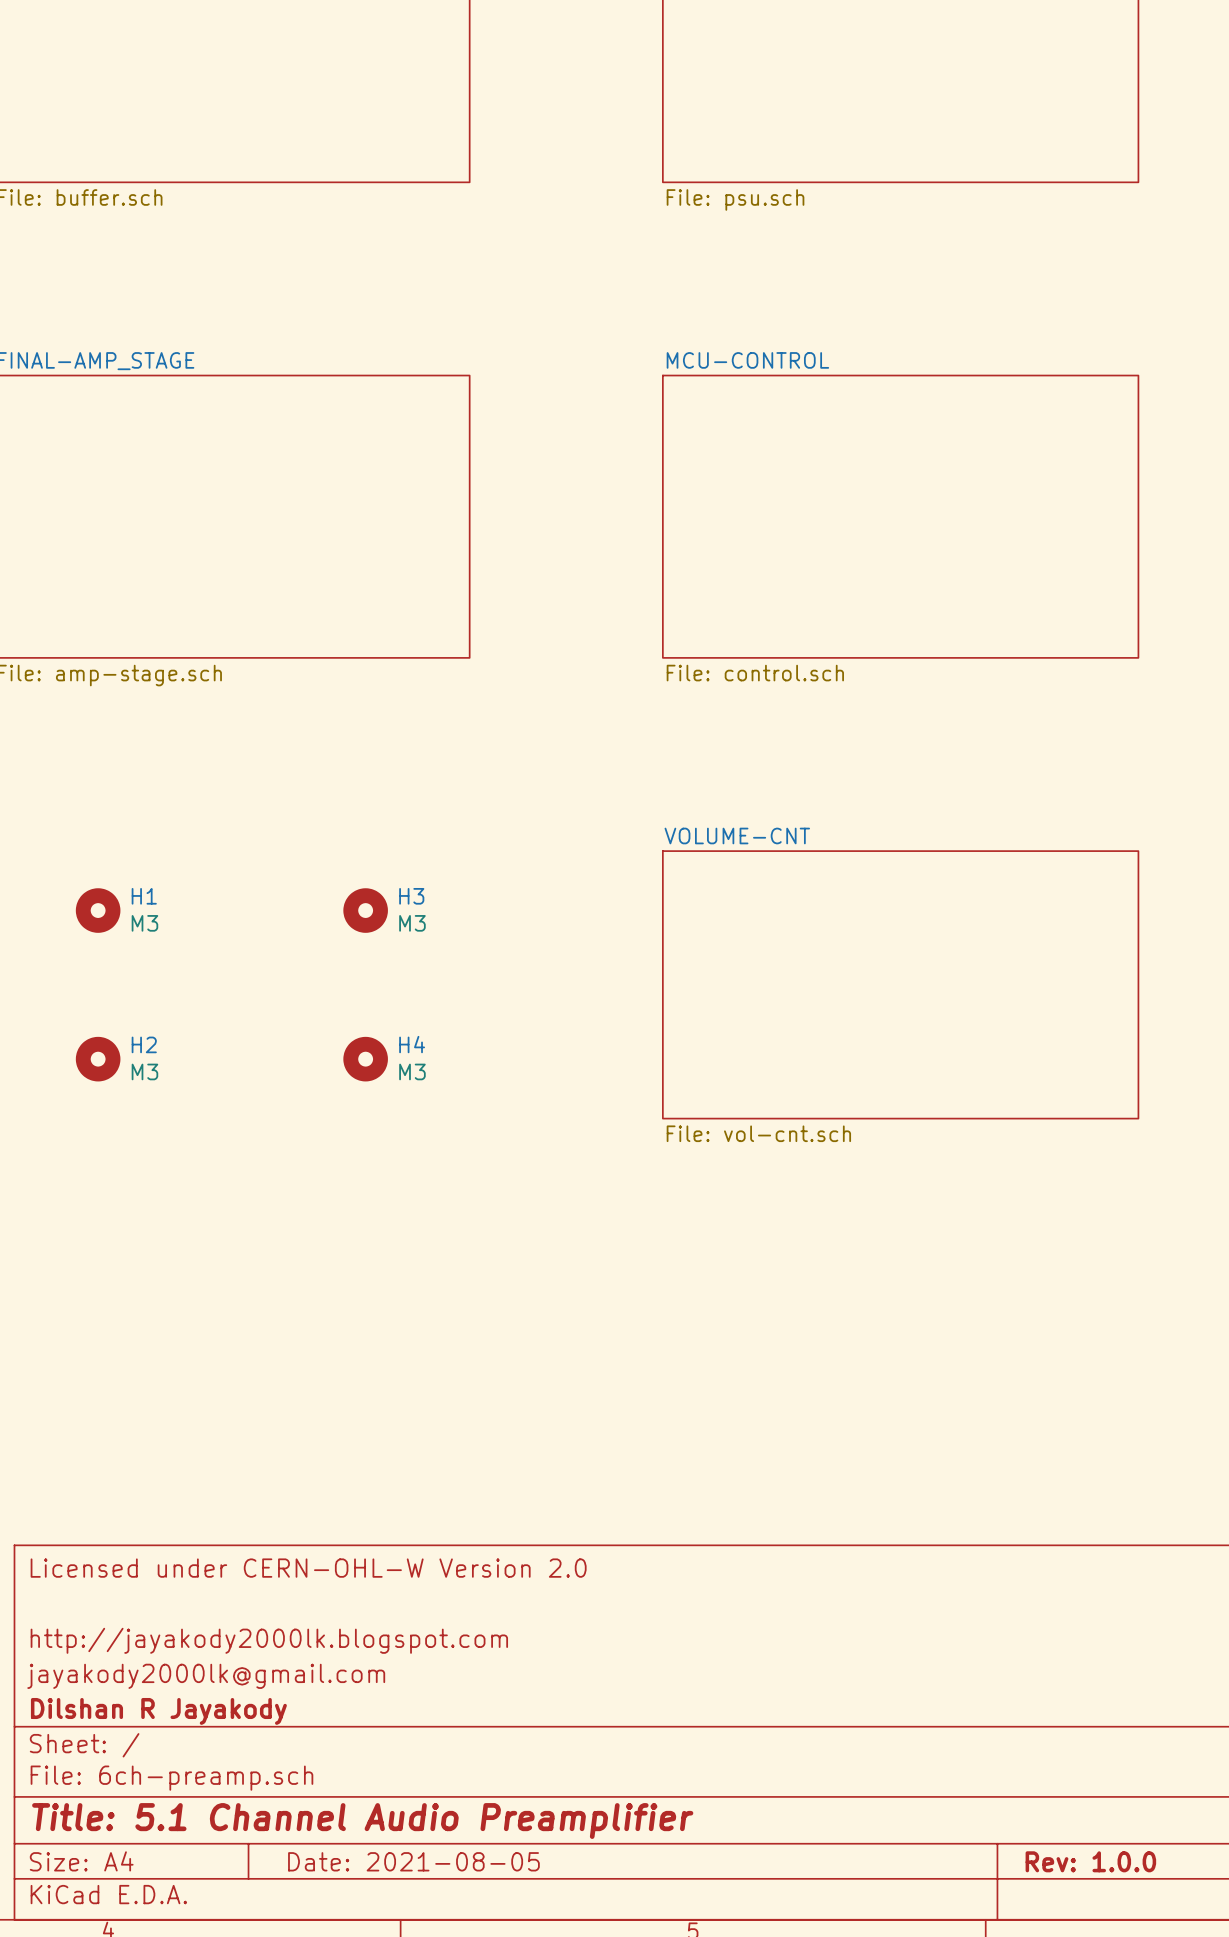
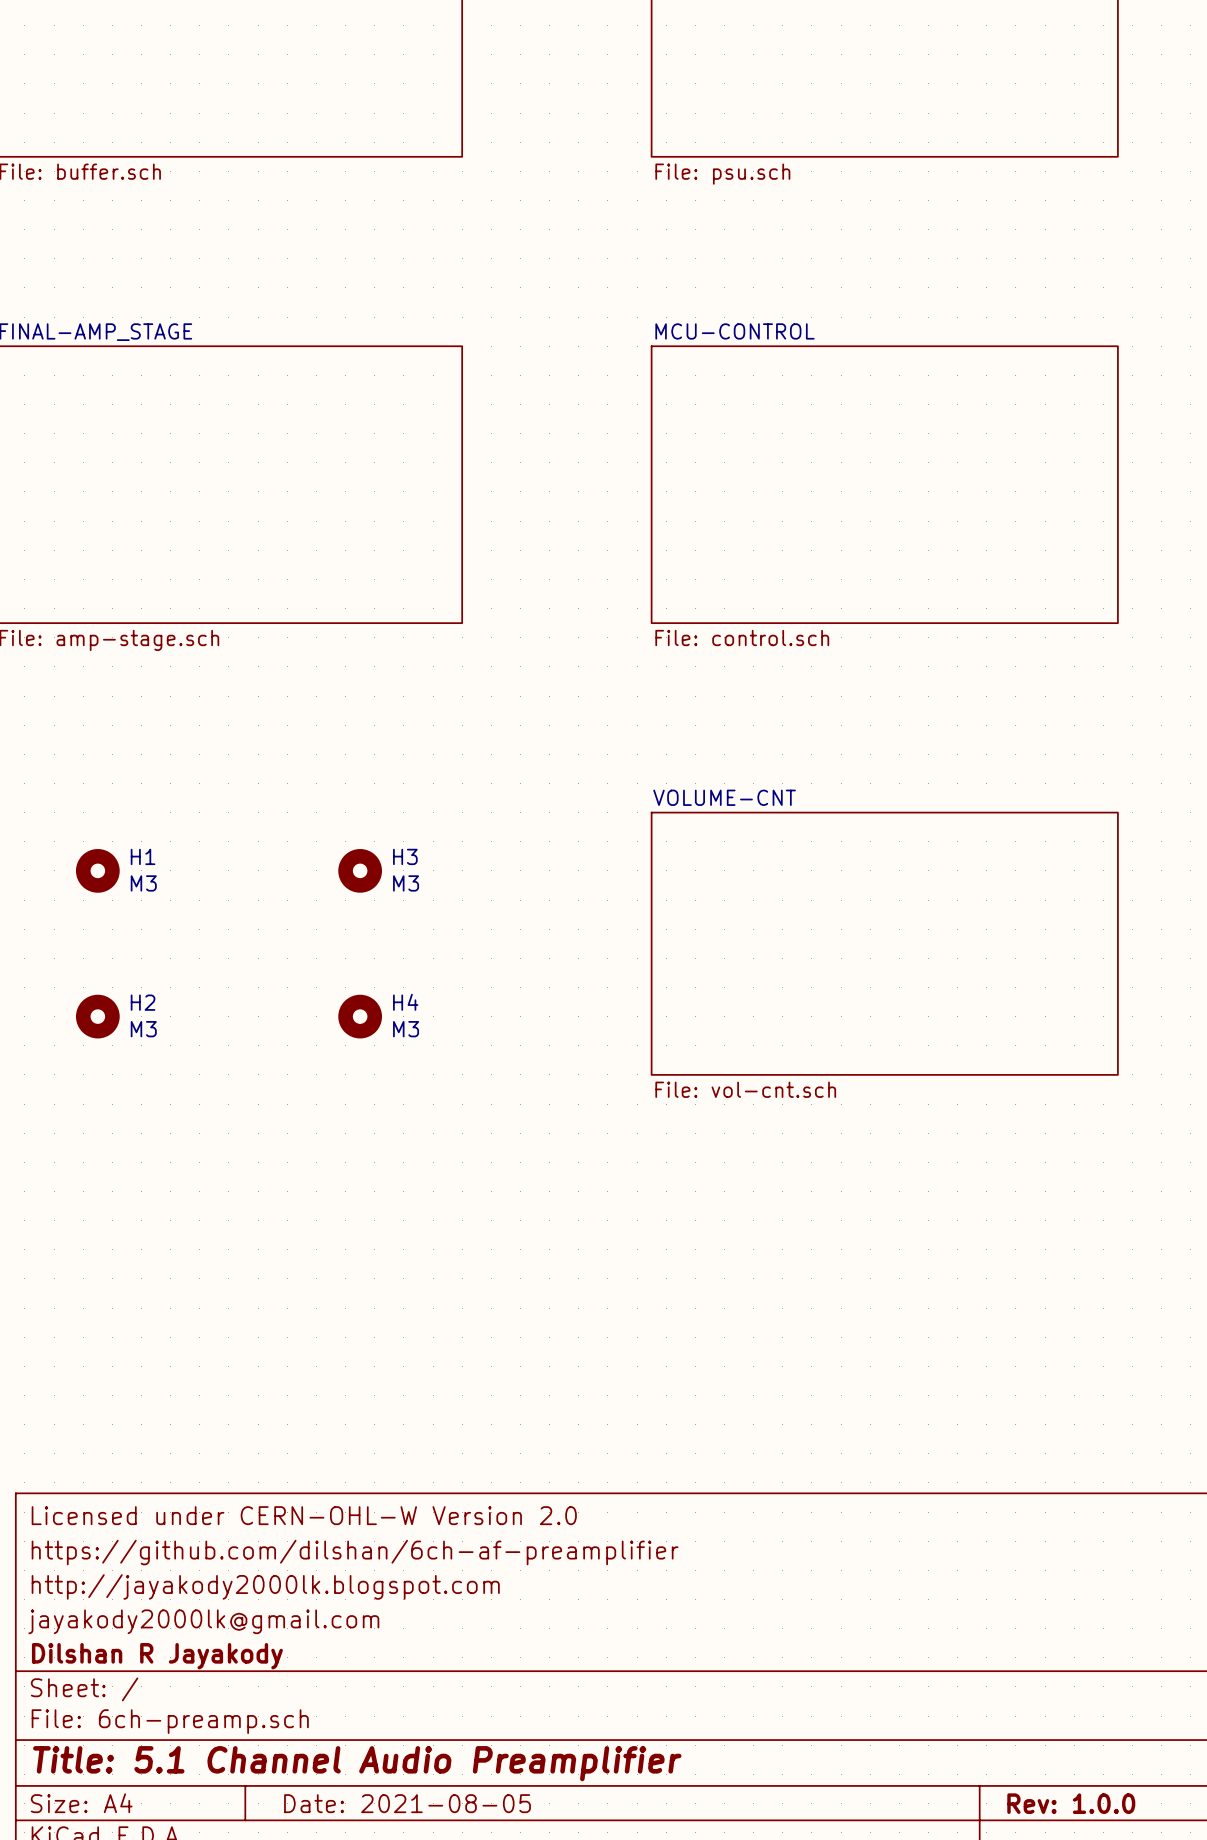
title block: none -> https://github.com/dilshan/6ch-af-preamplifier (355, 1552)

